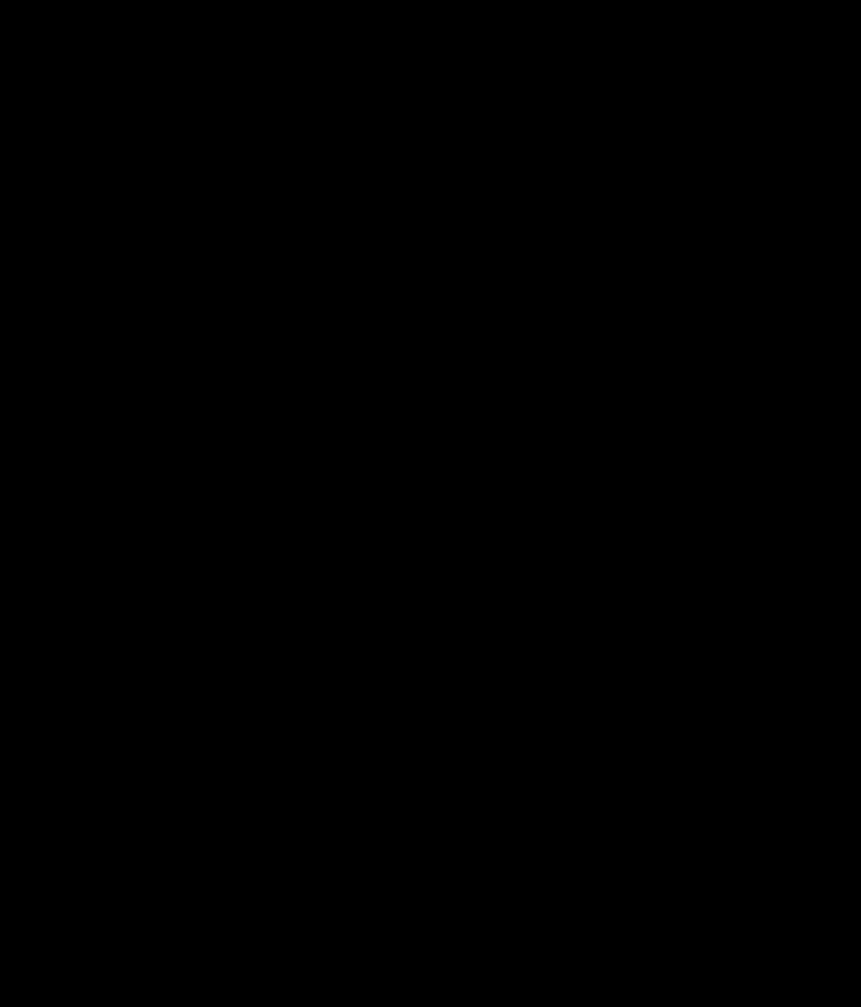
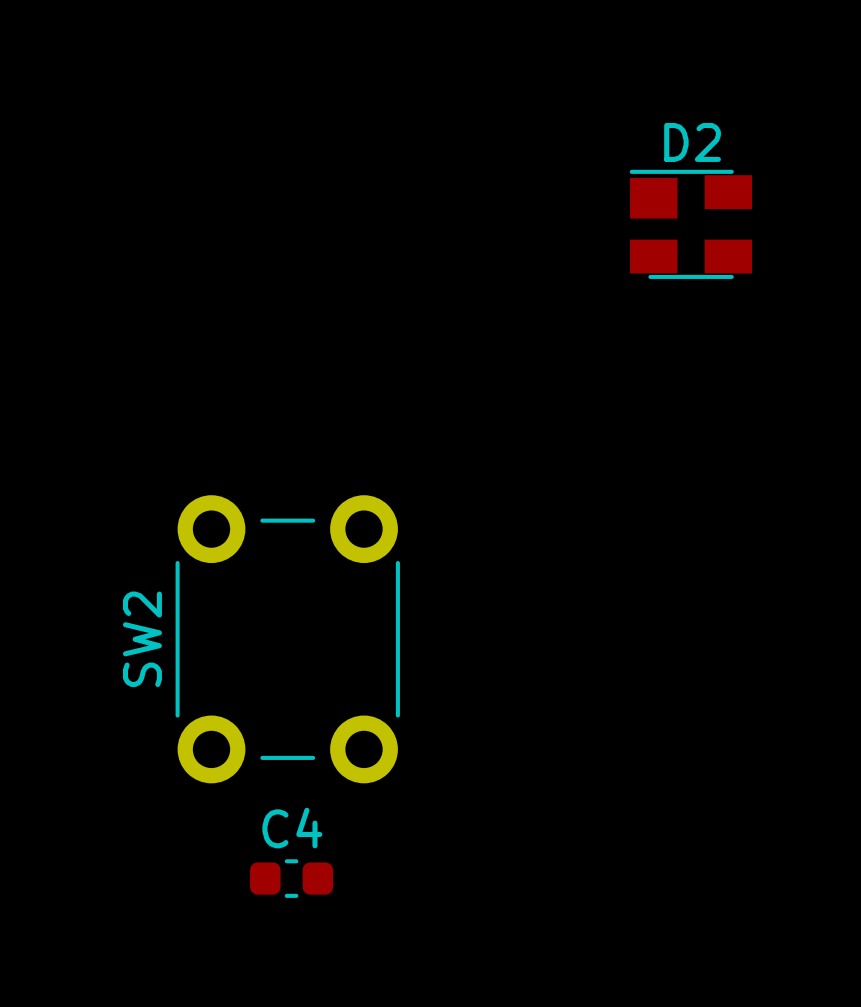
D2: none -> (690, 224)
SW2: none -> (287, 639)
C4: none -> (291, 878)

